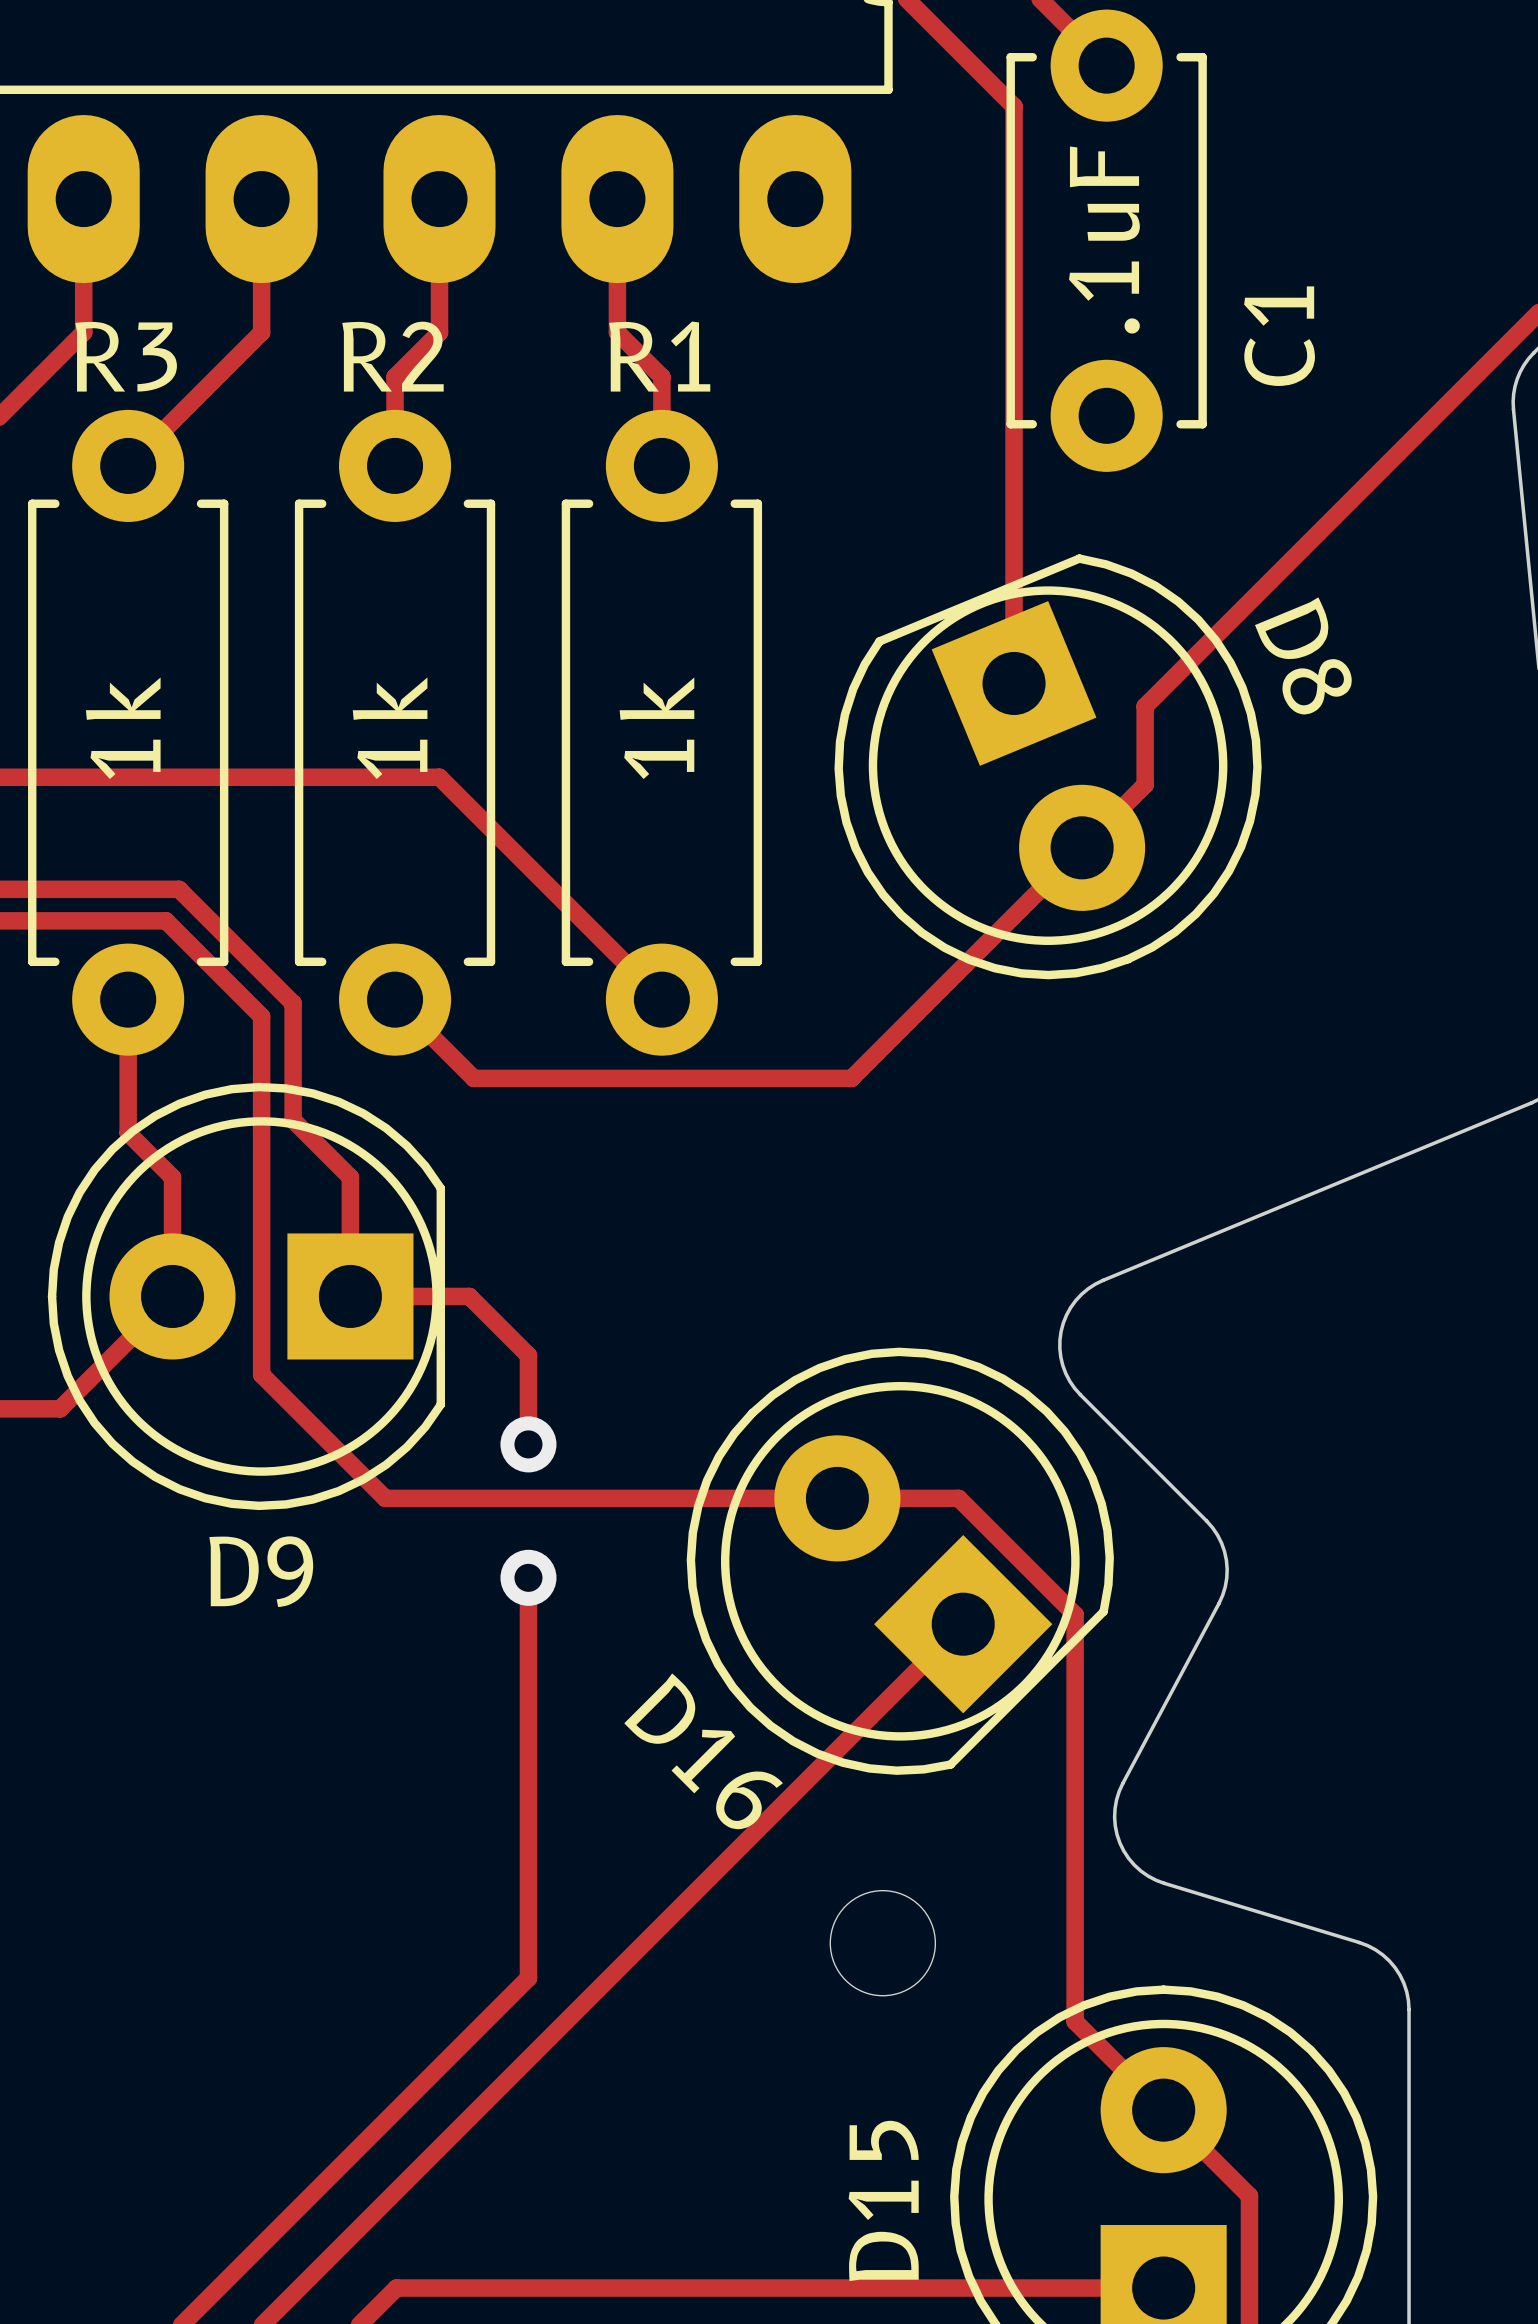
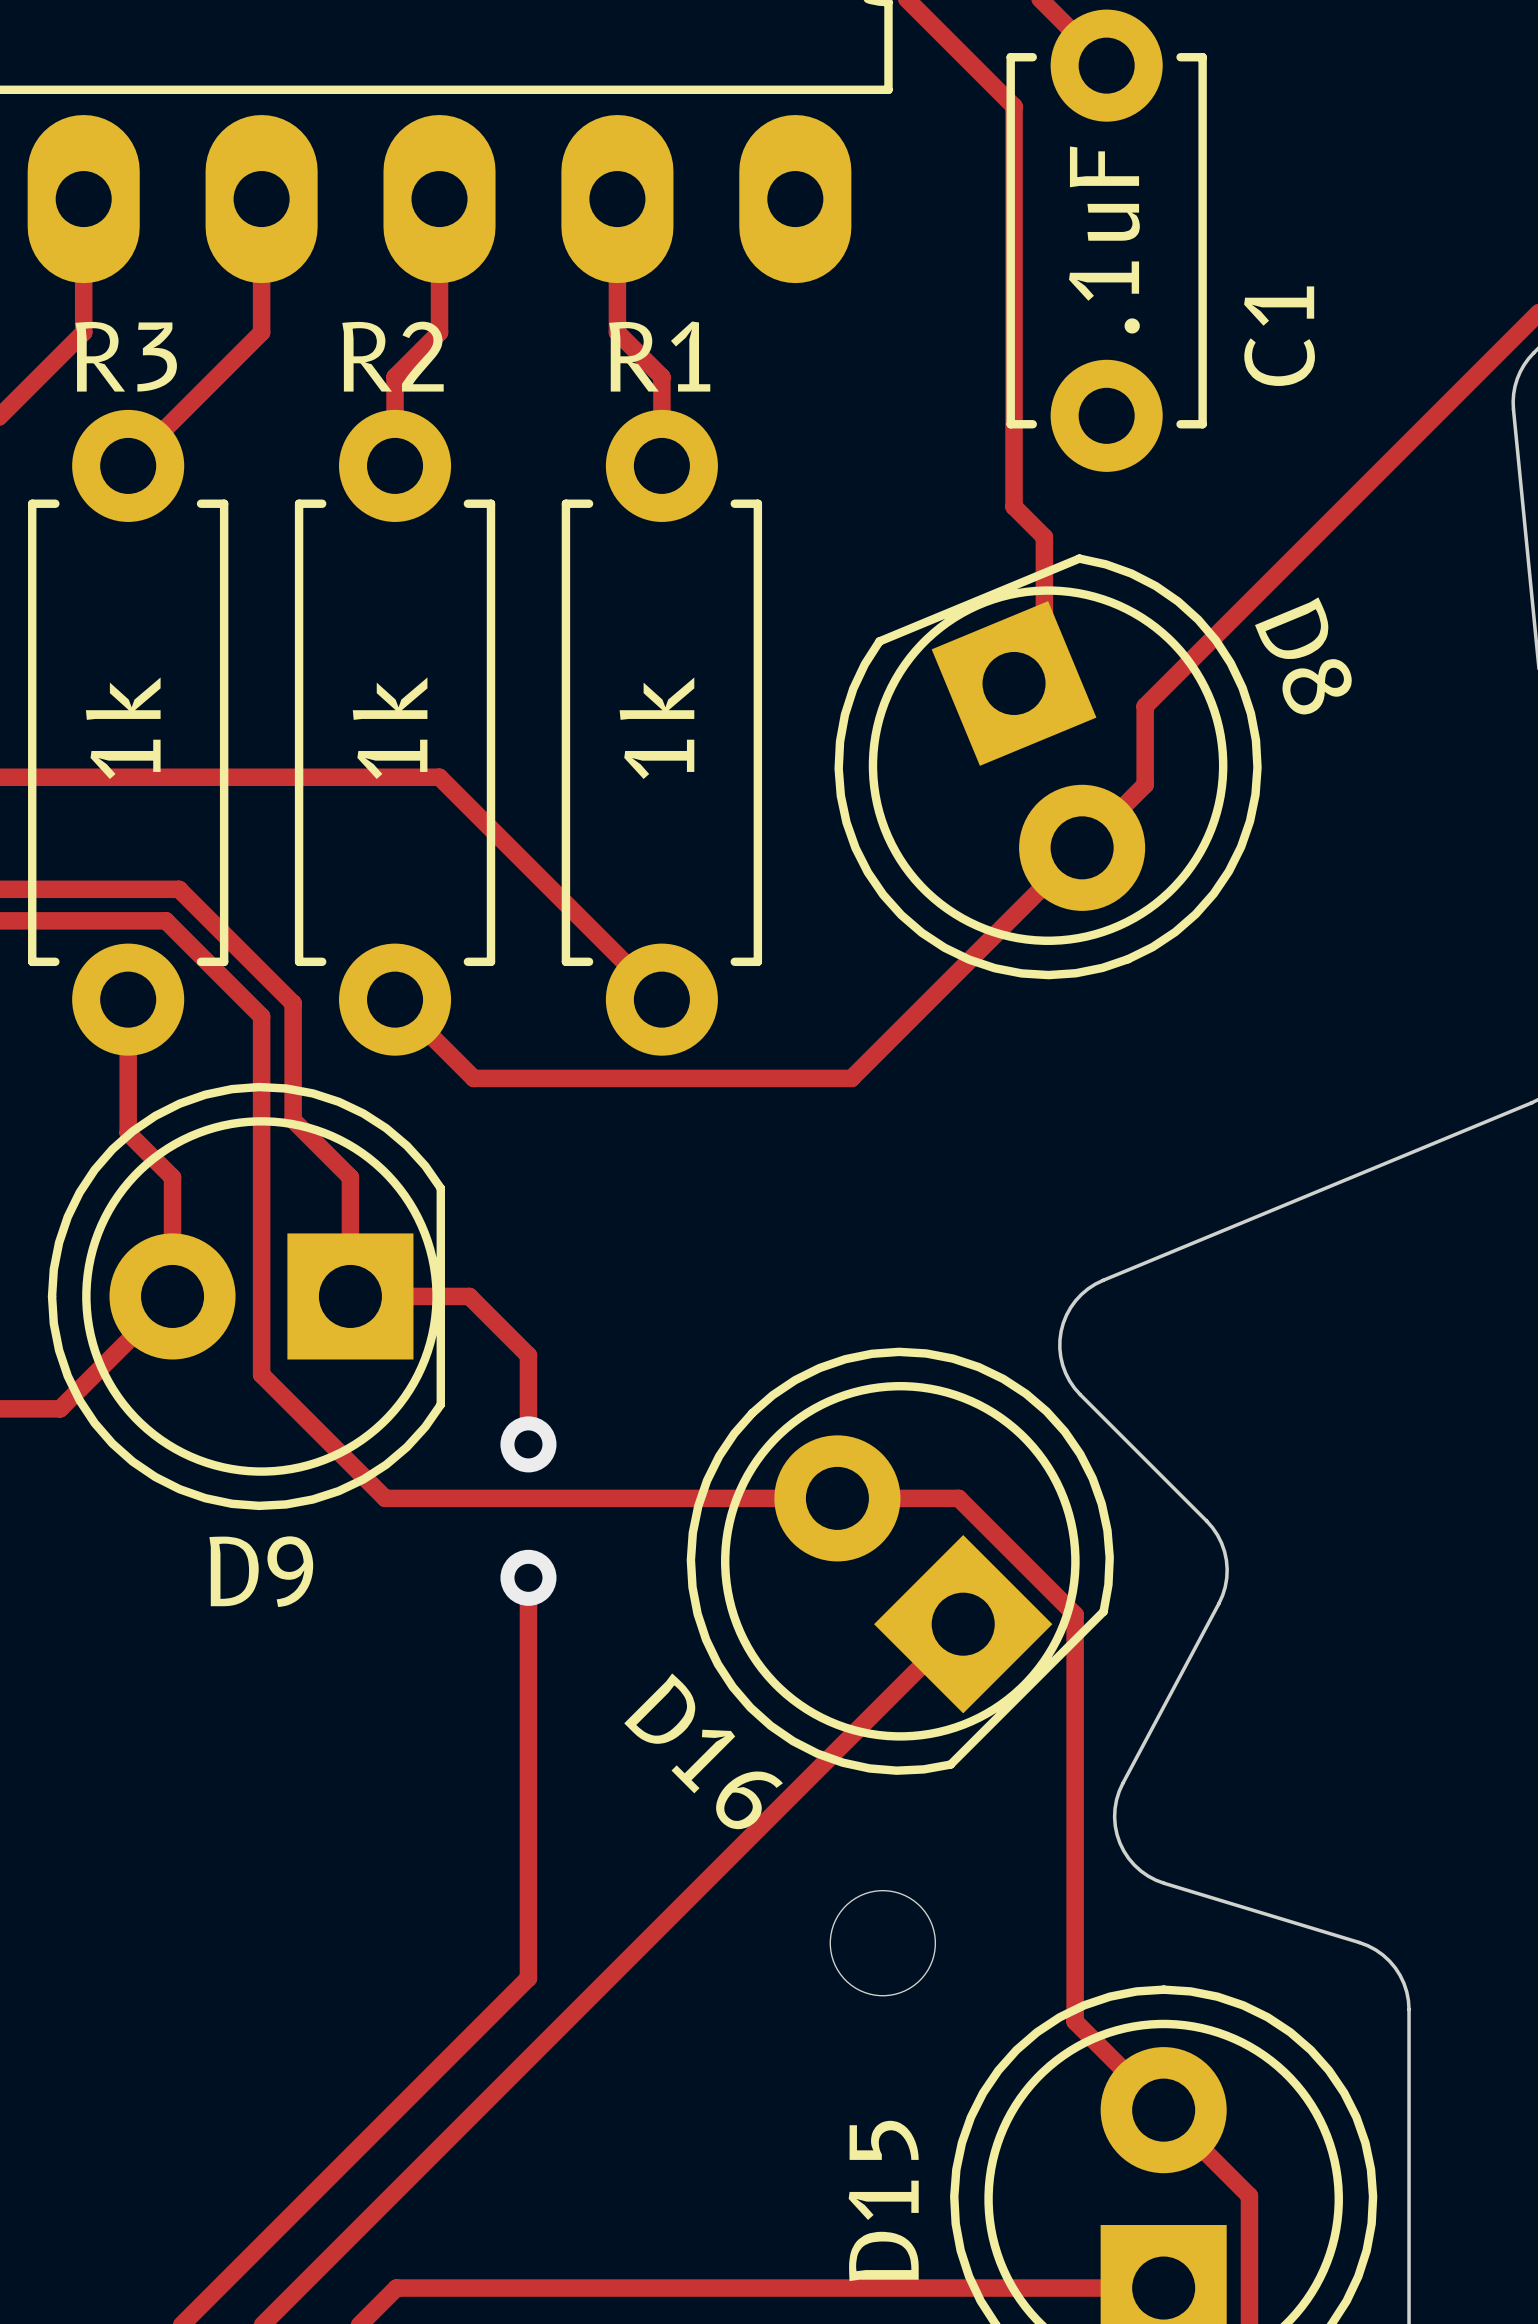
track: (1014, 506) (1014, 656) -> (1014, 506) (1044, 537) (1044, 626) (1014, 656)

